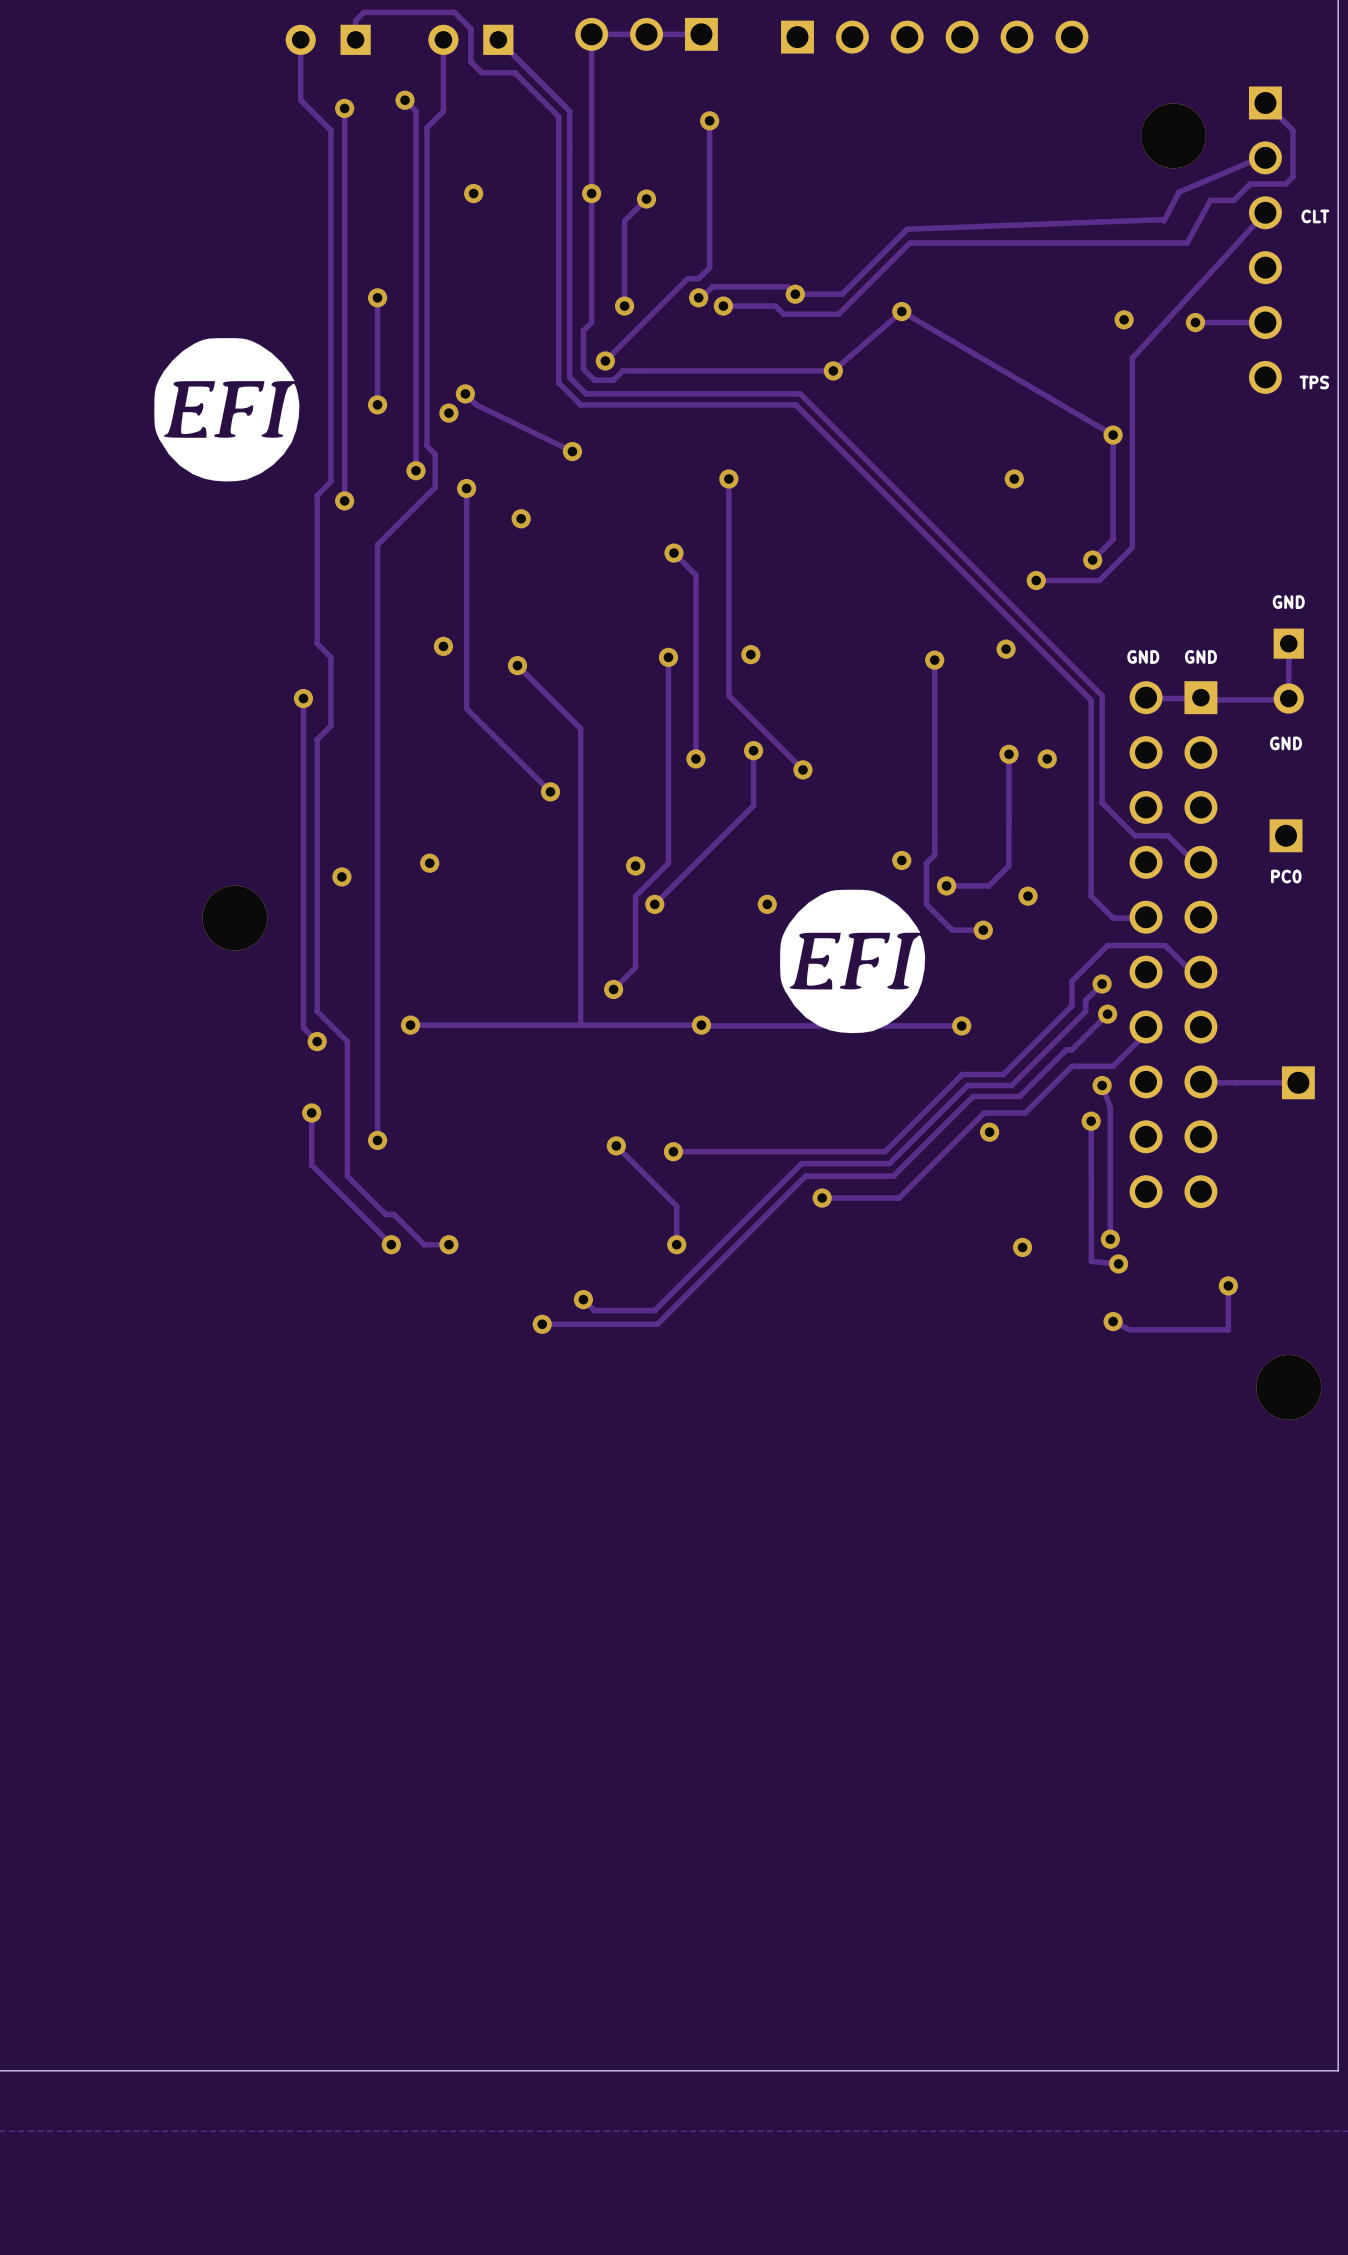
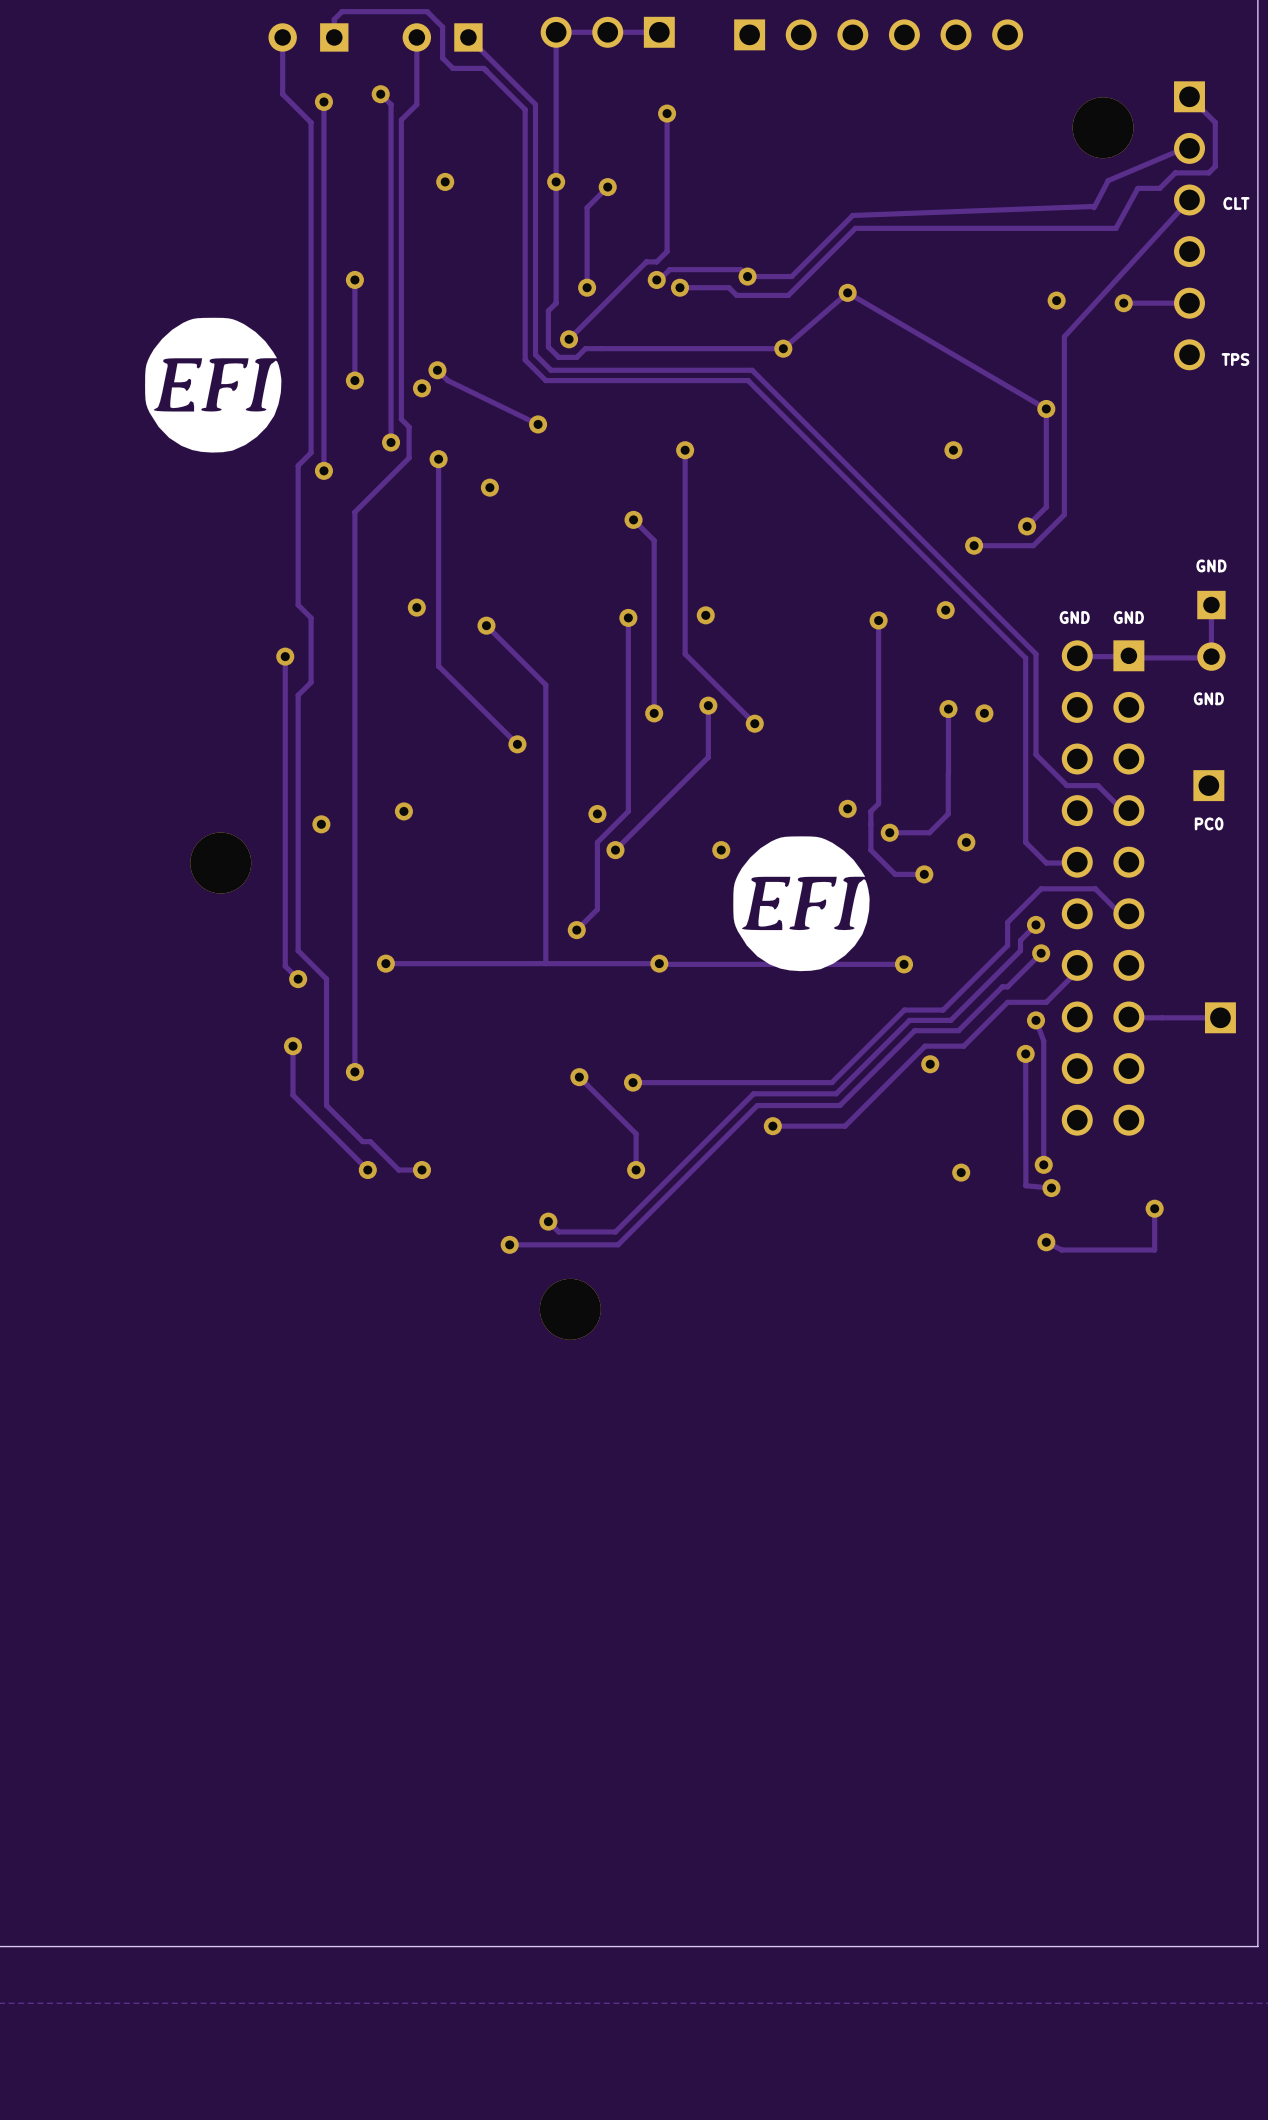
part: (1288, 1387) -> none
part: none -> (570, 1309)

